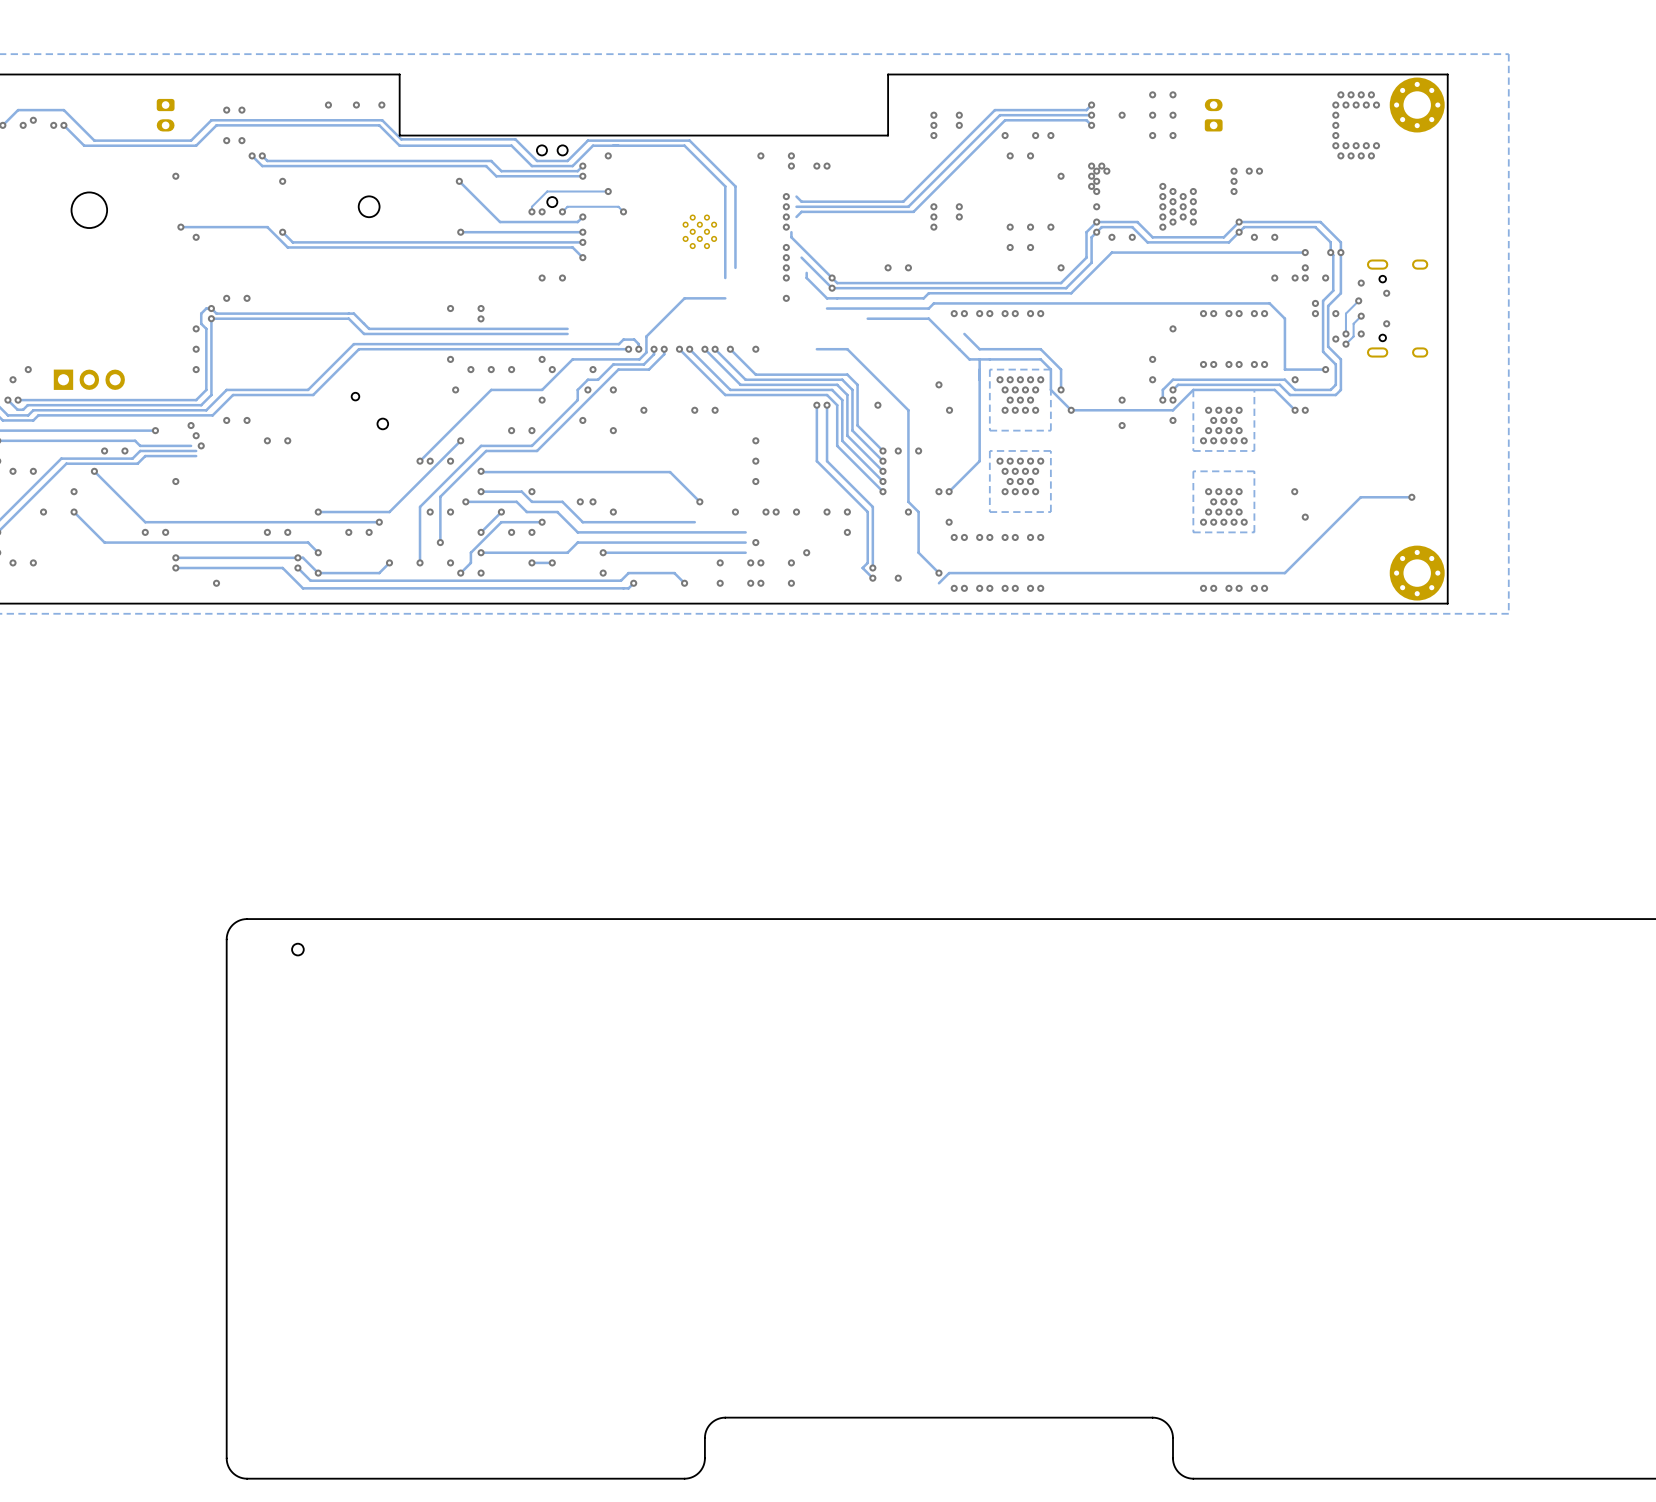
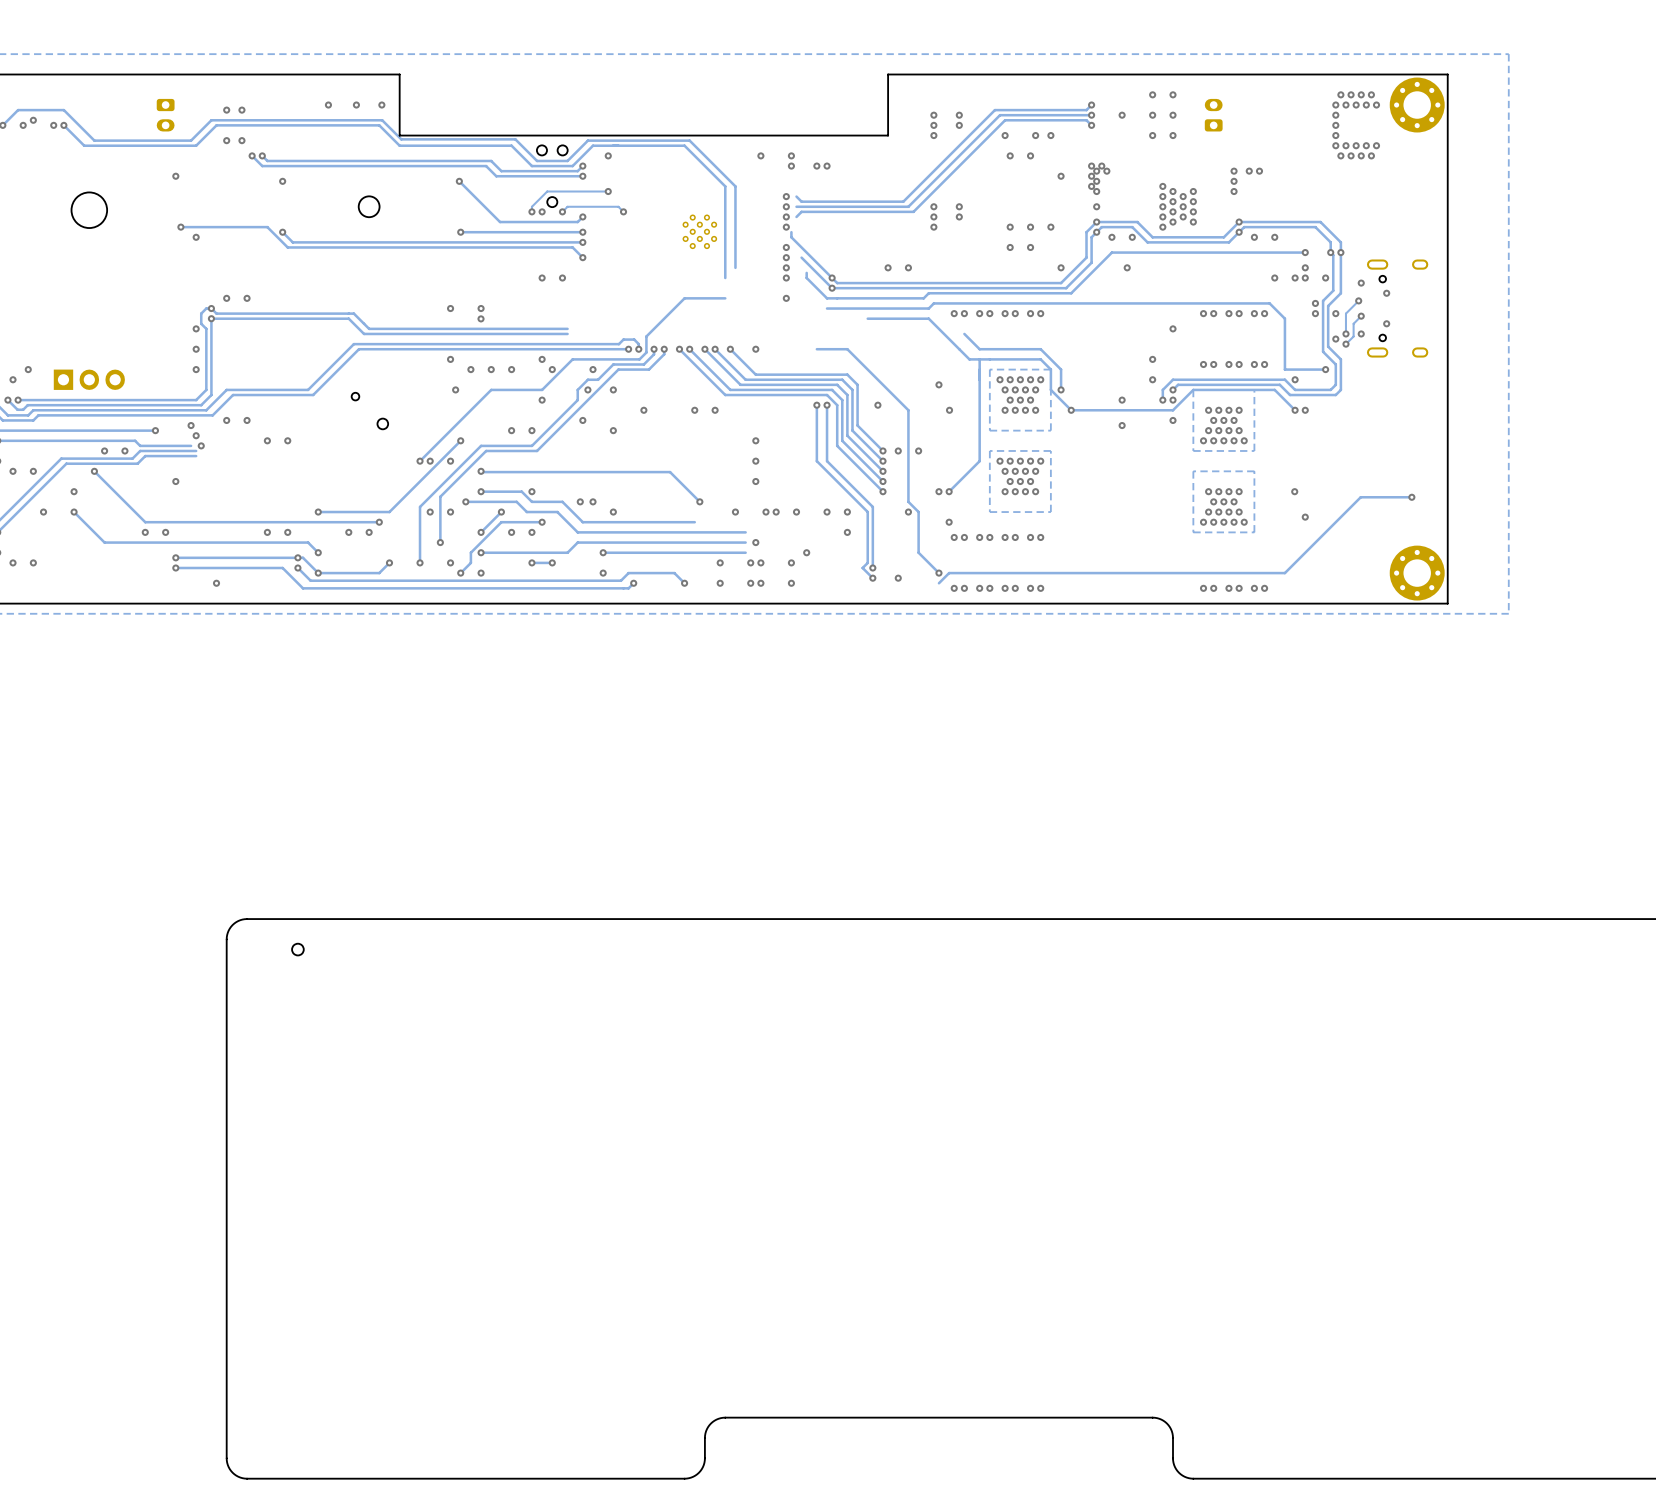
via: none -> (1127, 267)

